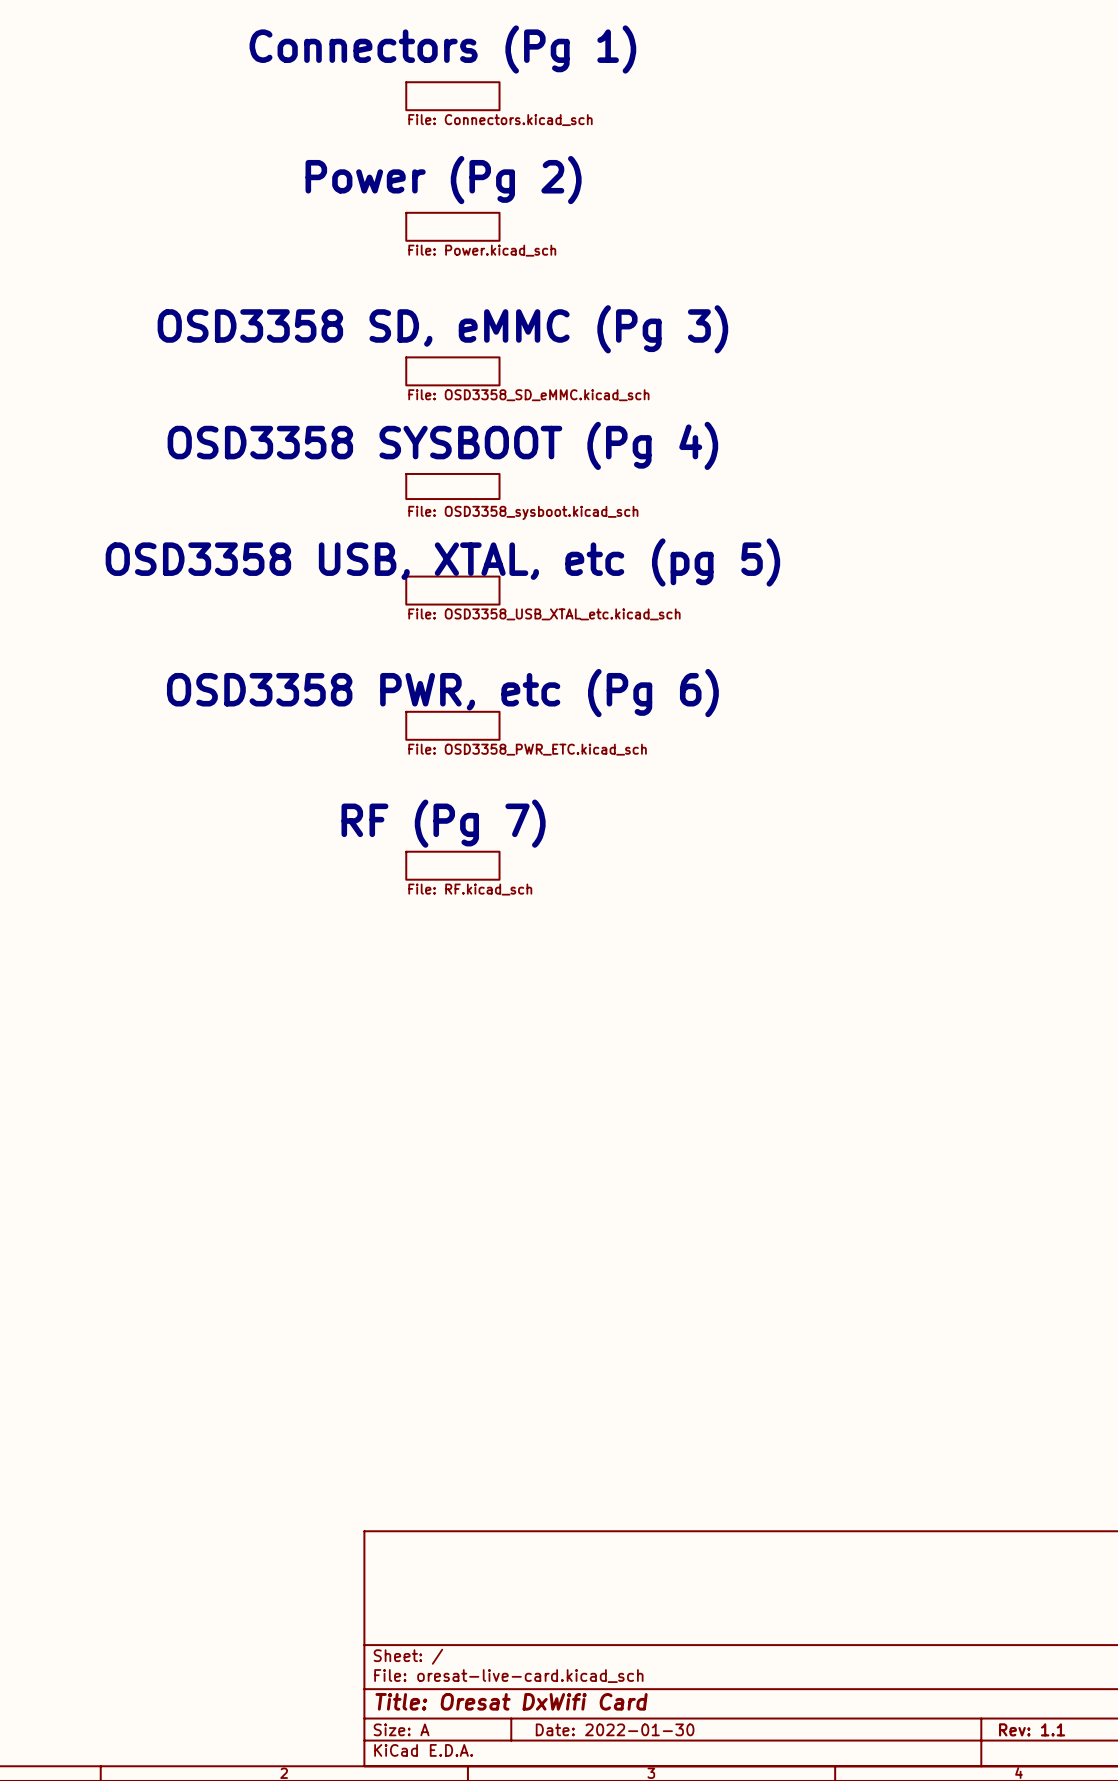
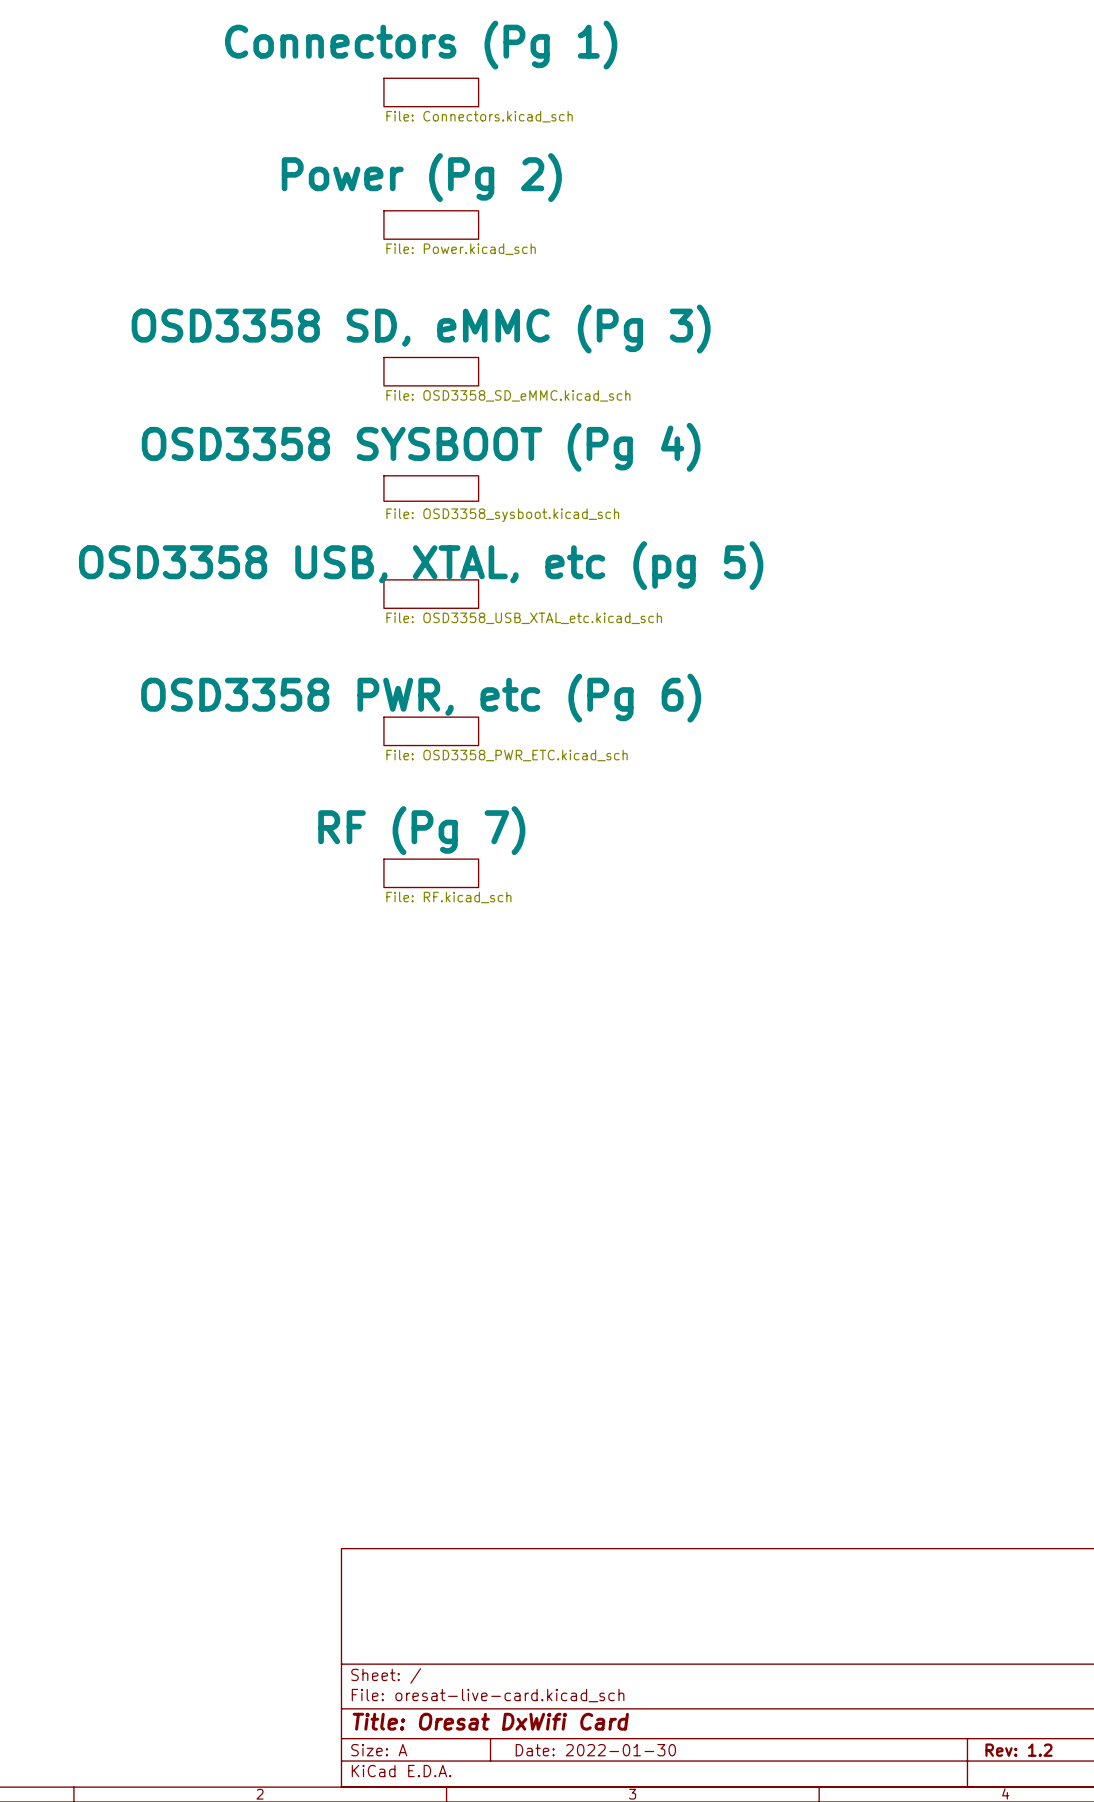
title block: Rev: 1.1 (1032, 1729) -> Rev: 1.2 (1018, 1750)

